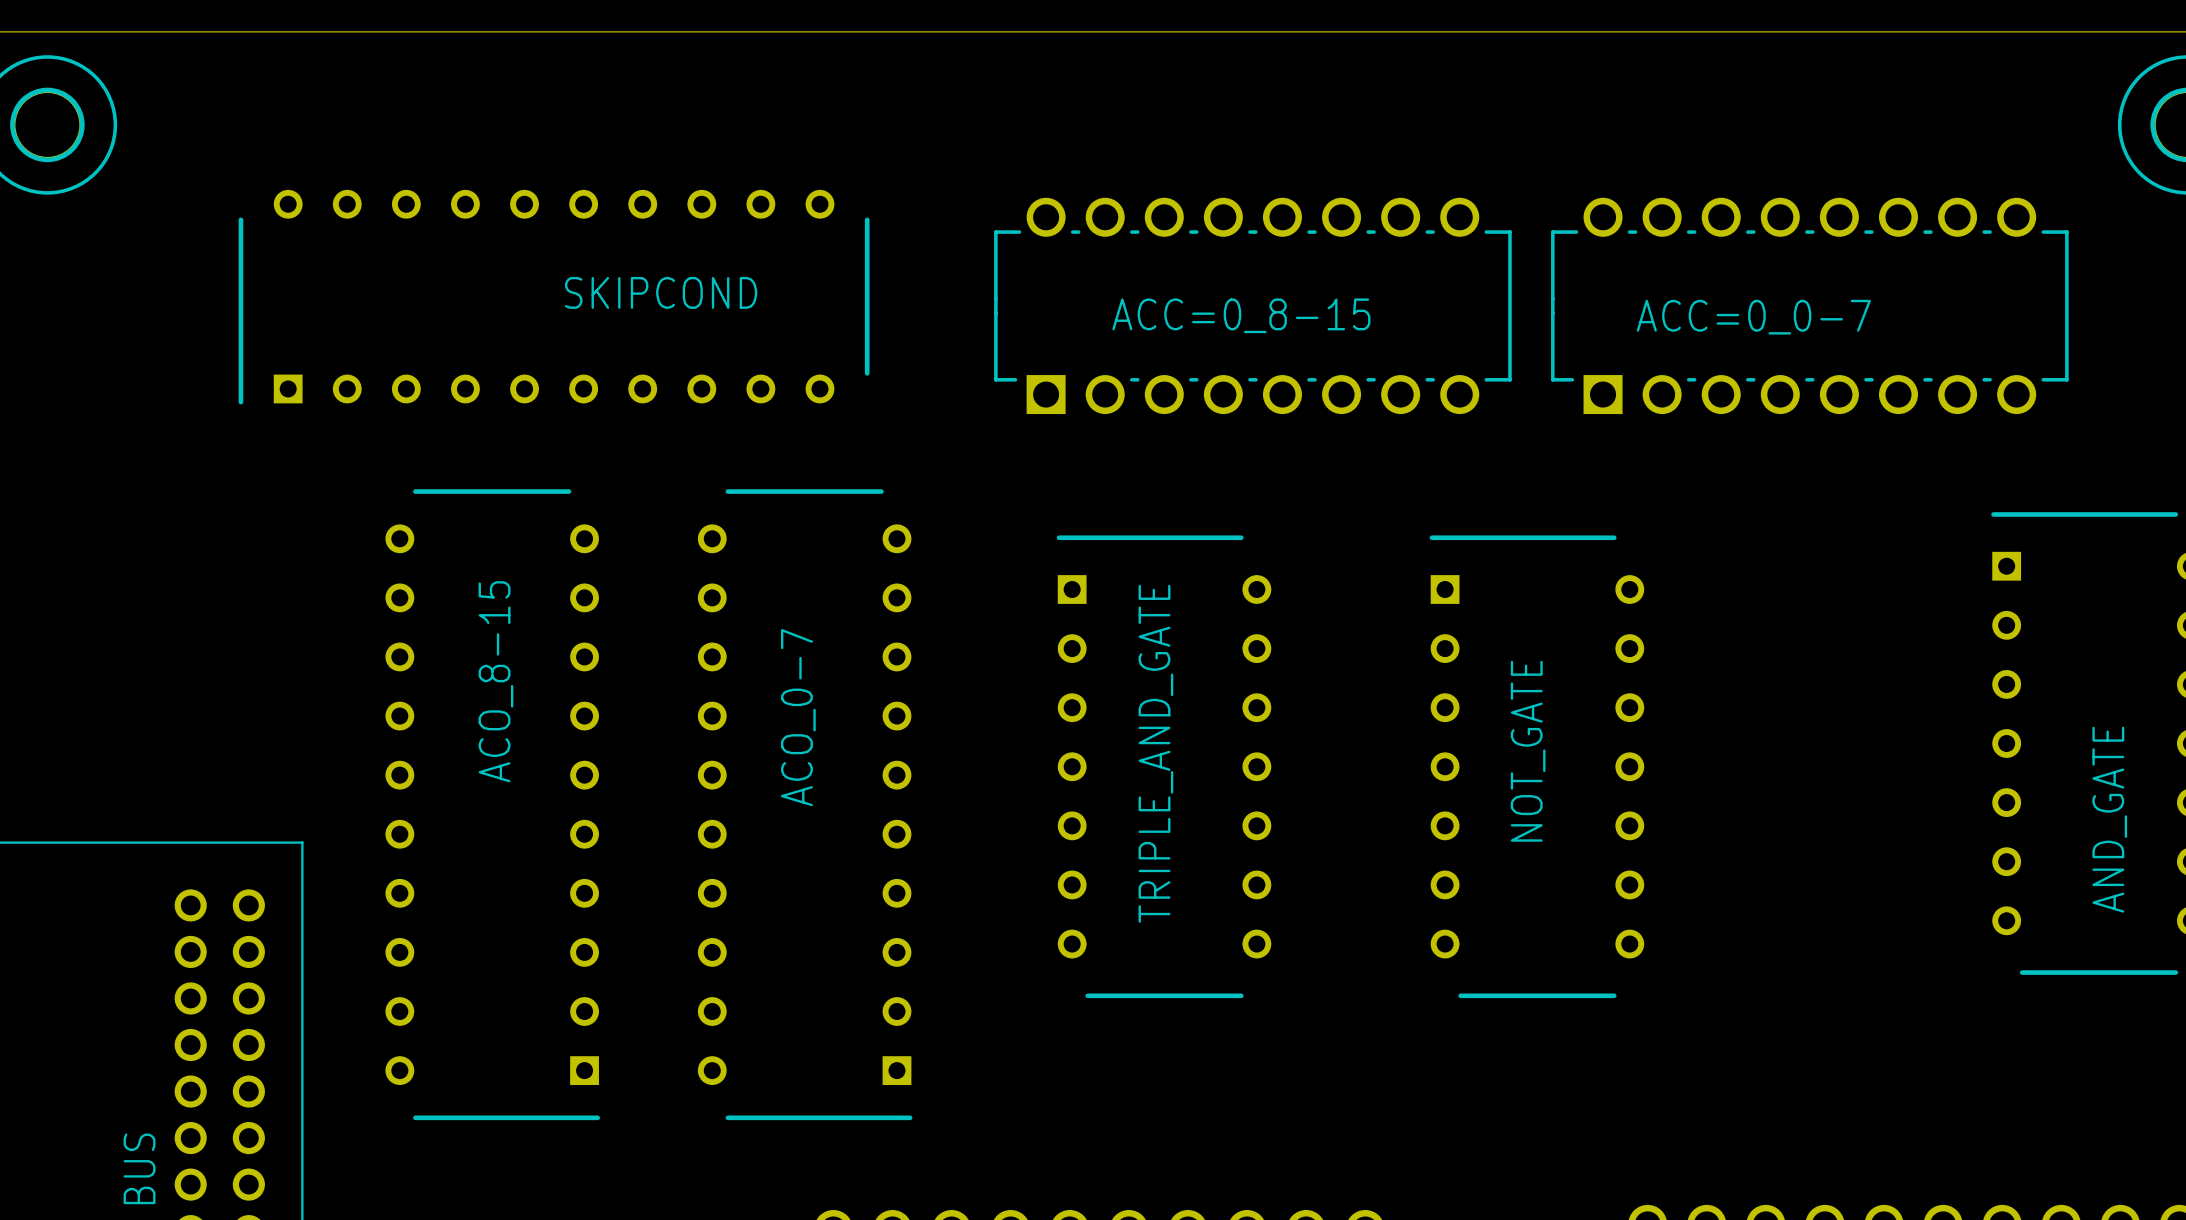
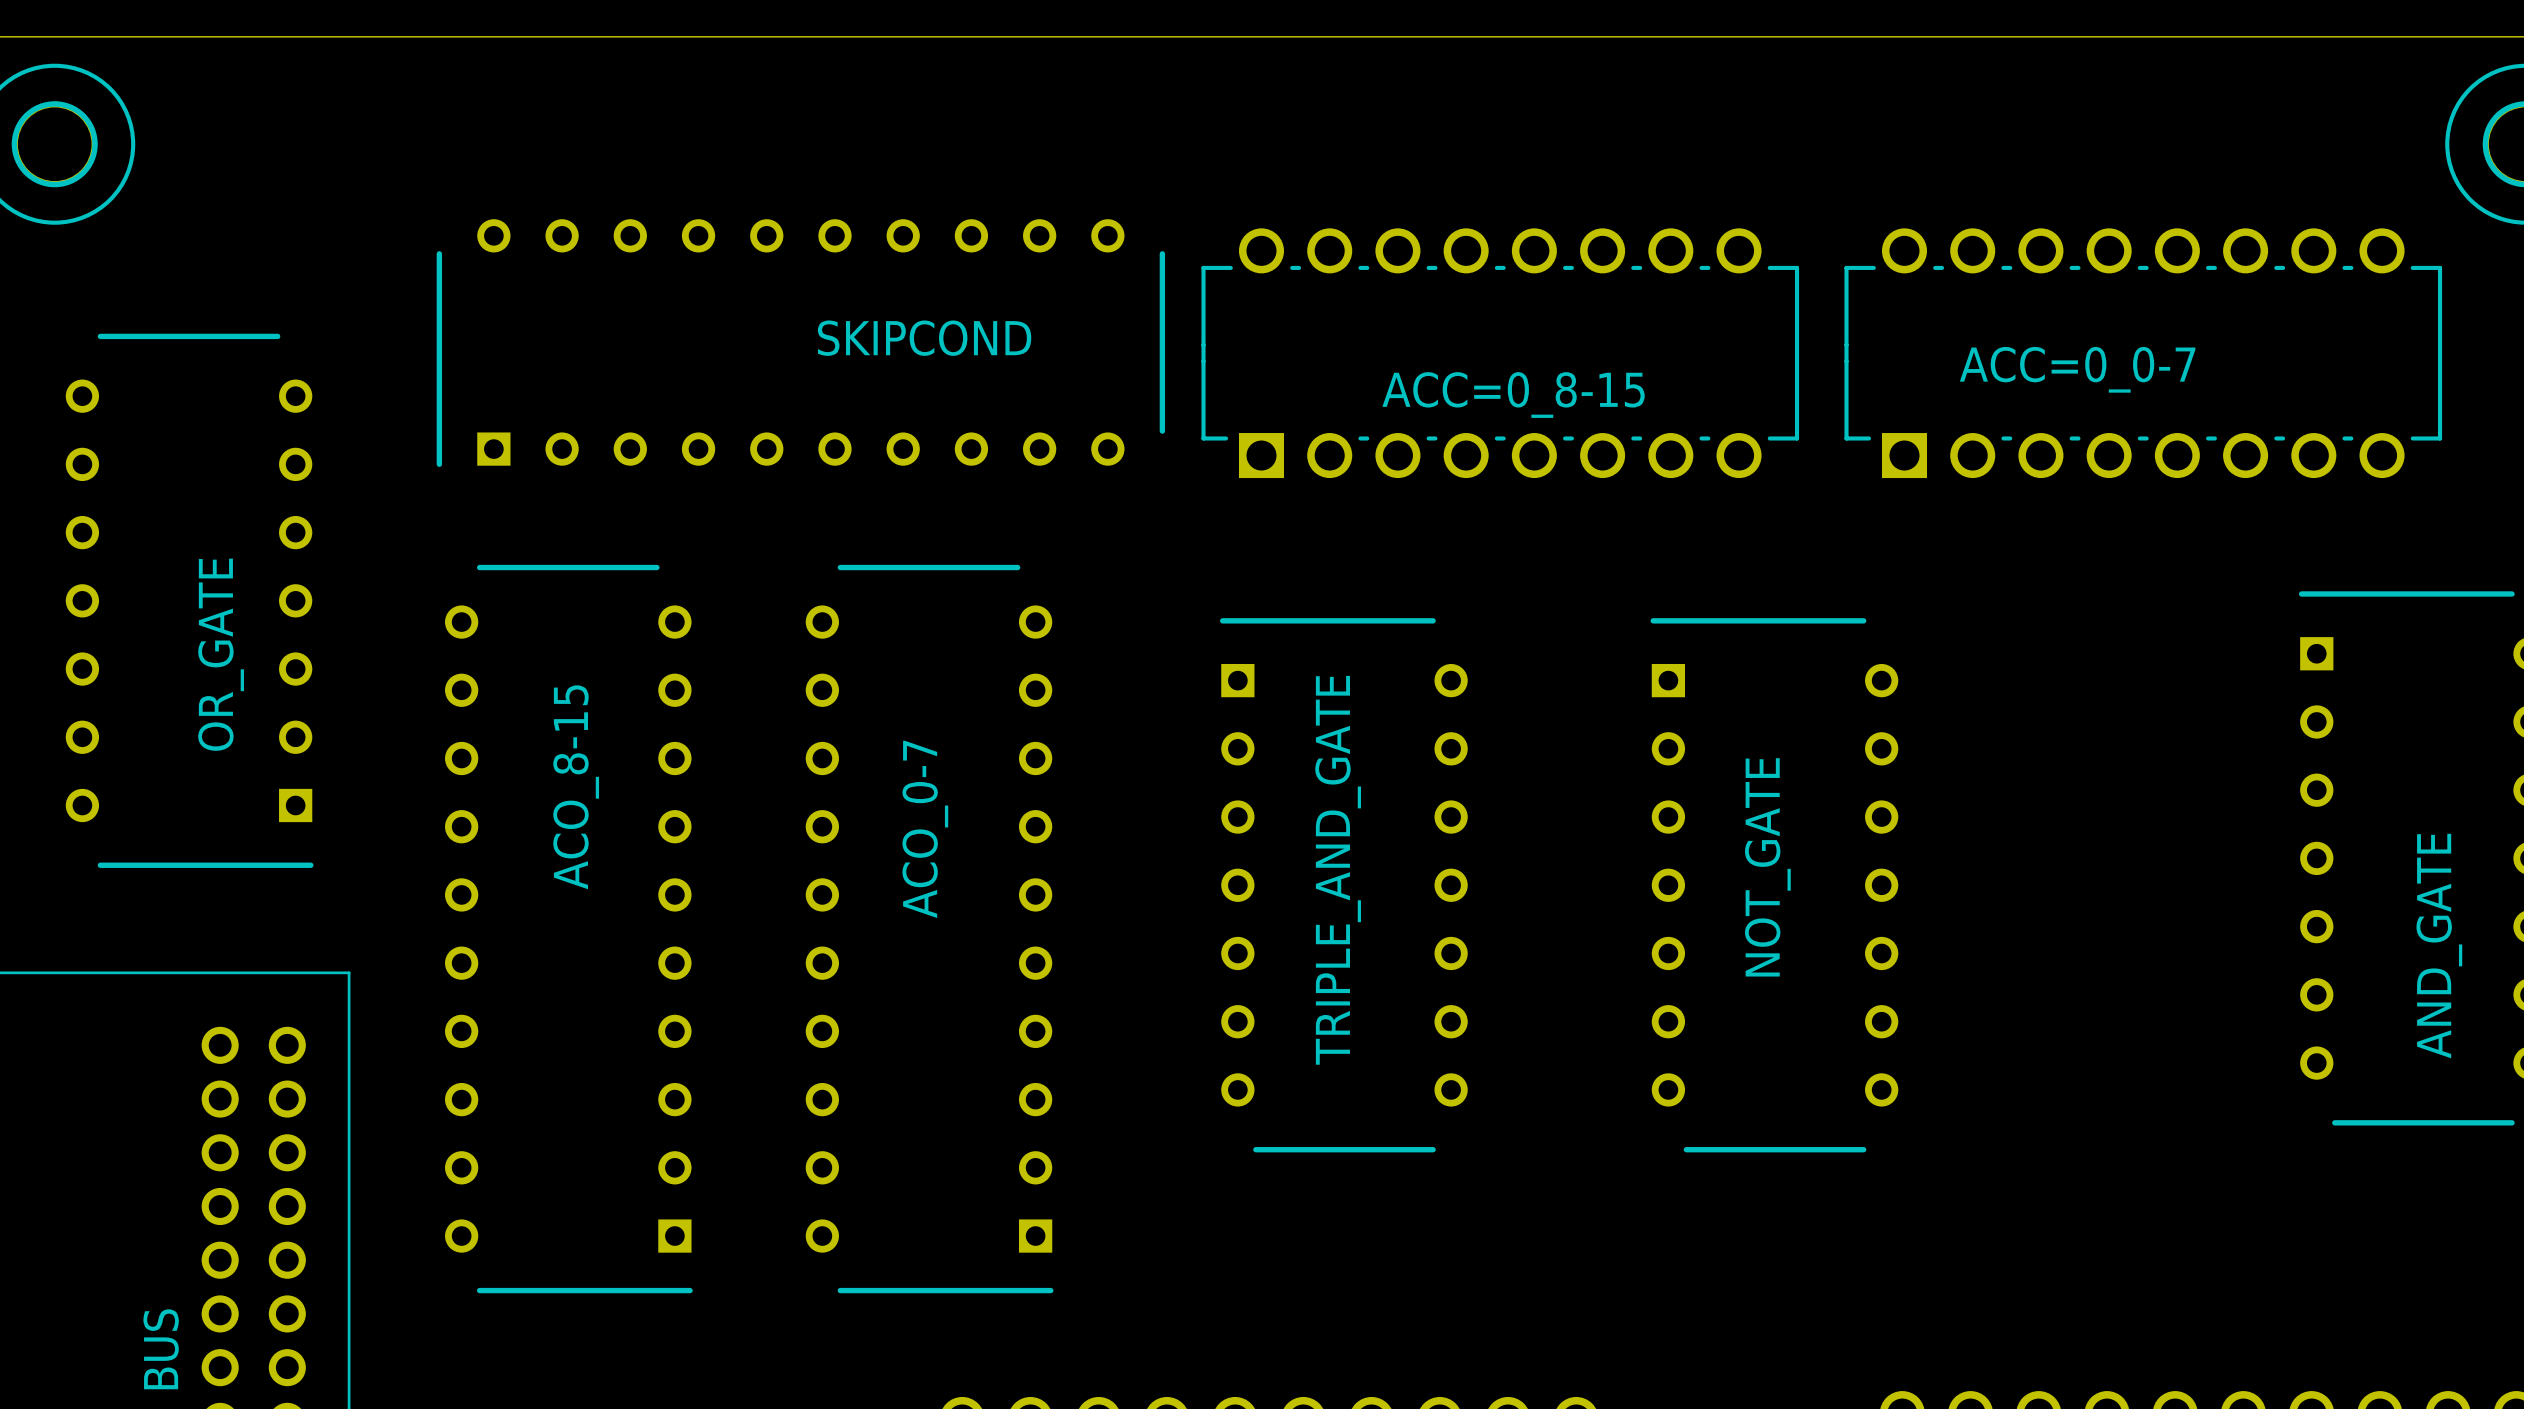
SKIPCOND position: (554, 297) -> (800, 343)
ACC=0_8-15 position: (1252, 305) -> (1500, 353)
ACC=0_0-7 position: (1809, 305) -> (2143, 353)
ACC=0_8-15 name position: ACC=0_8-15 (1241, 315) -> ACC=0_8-15 (1513, 395)
OR_GATE: none -> (189, 600)

